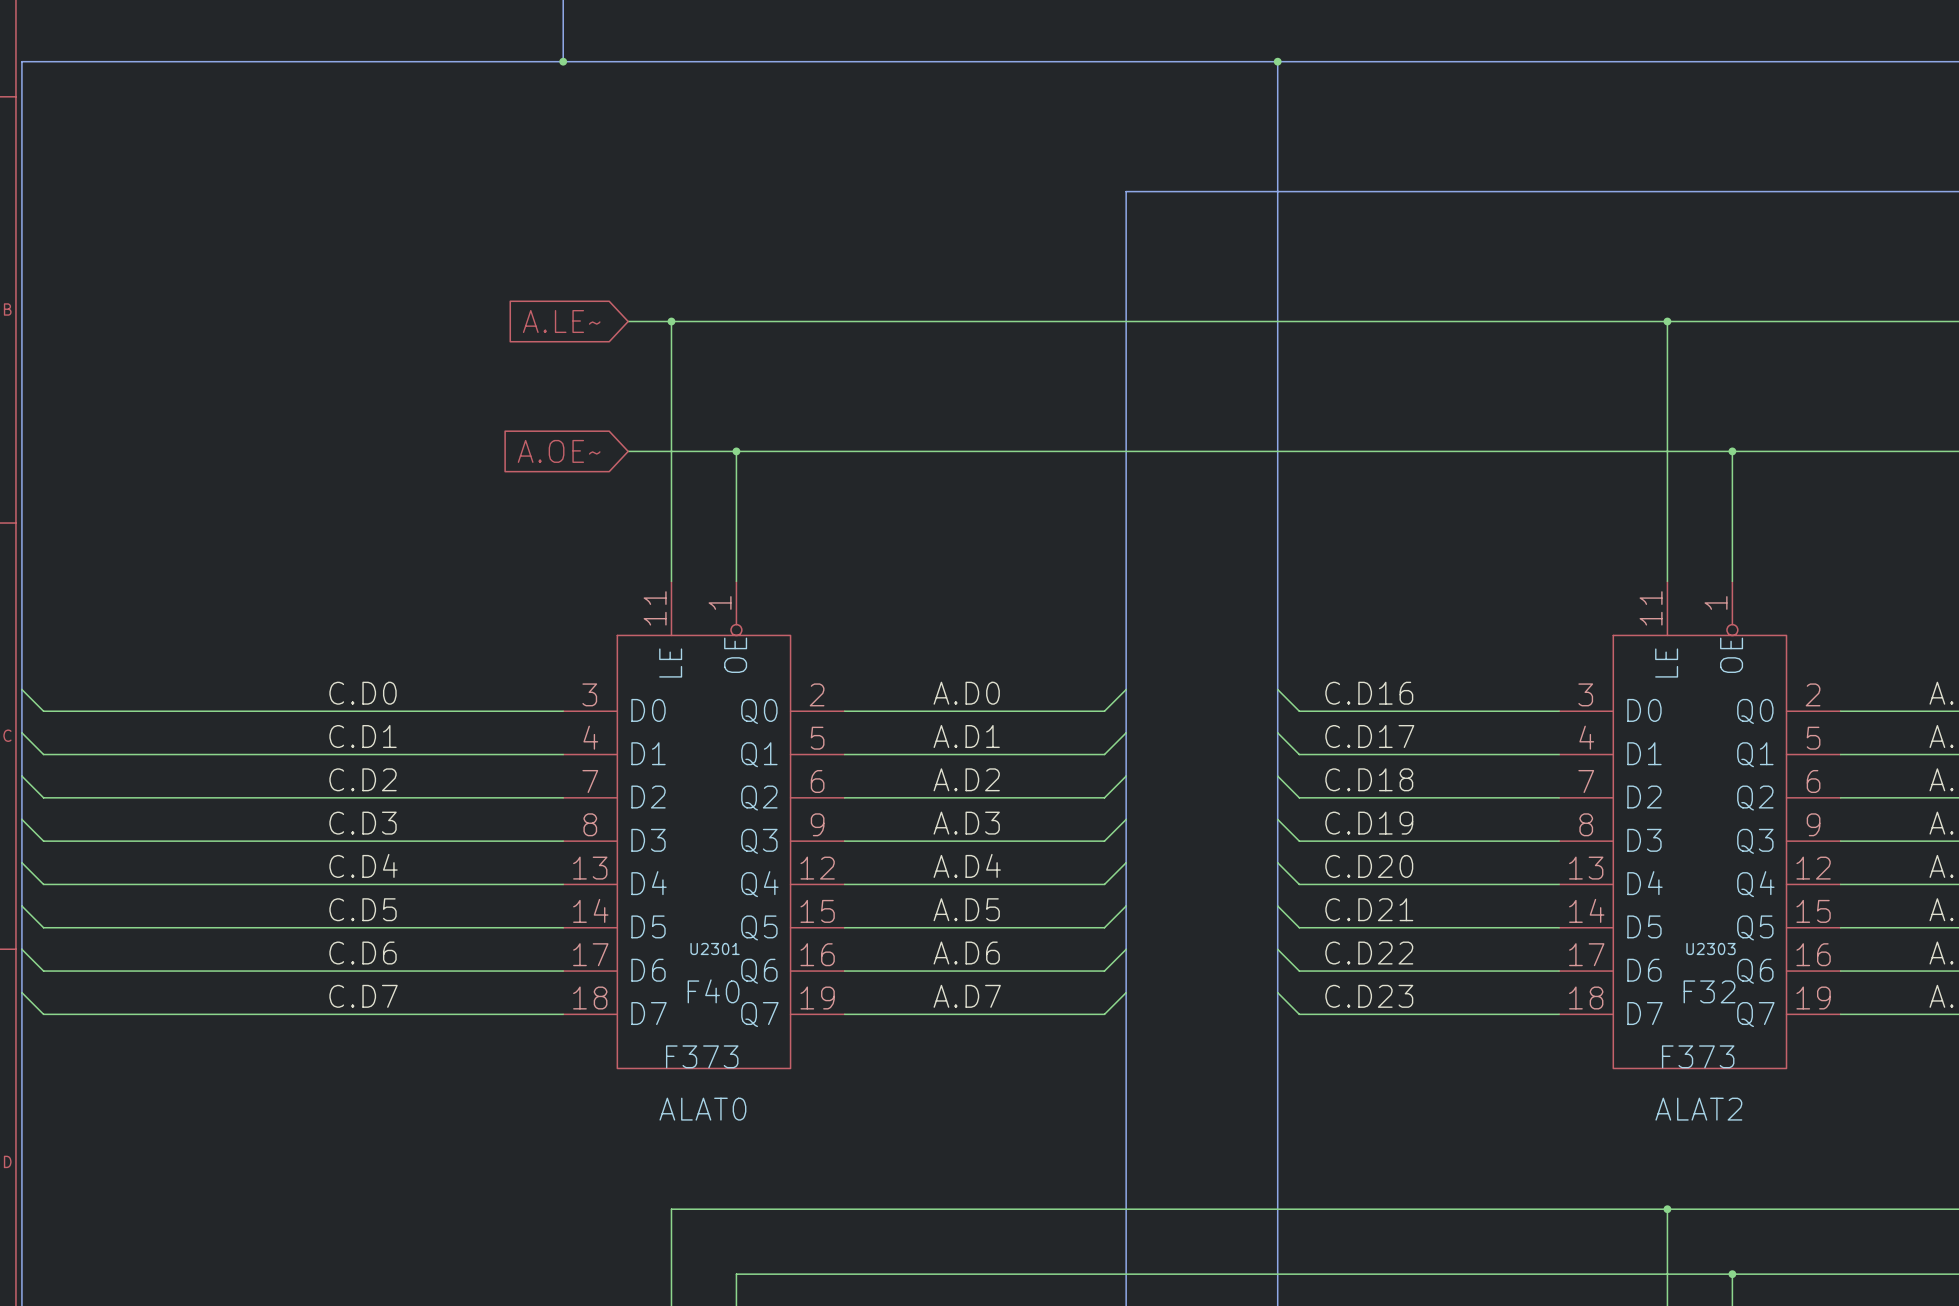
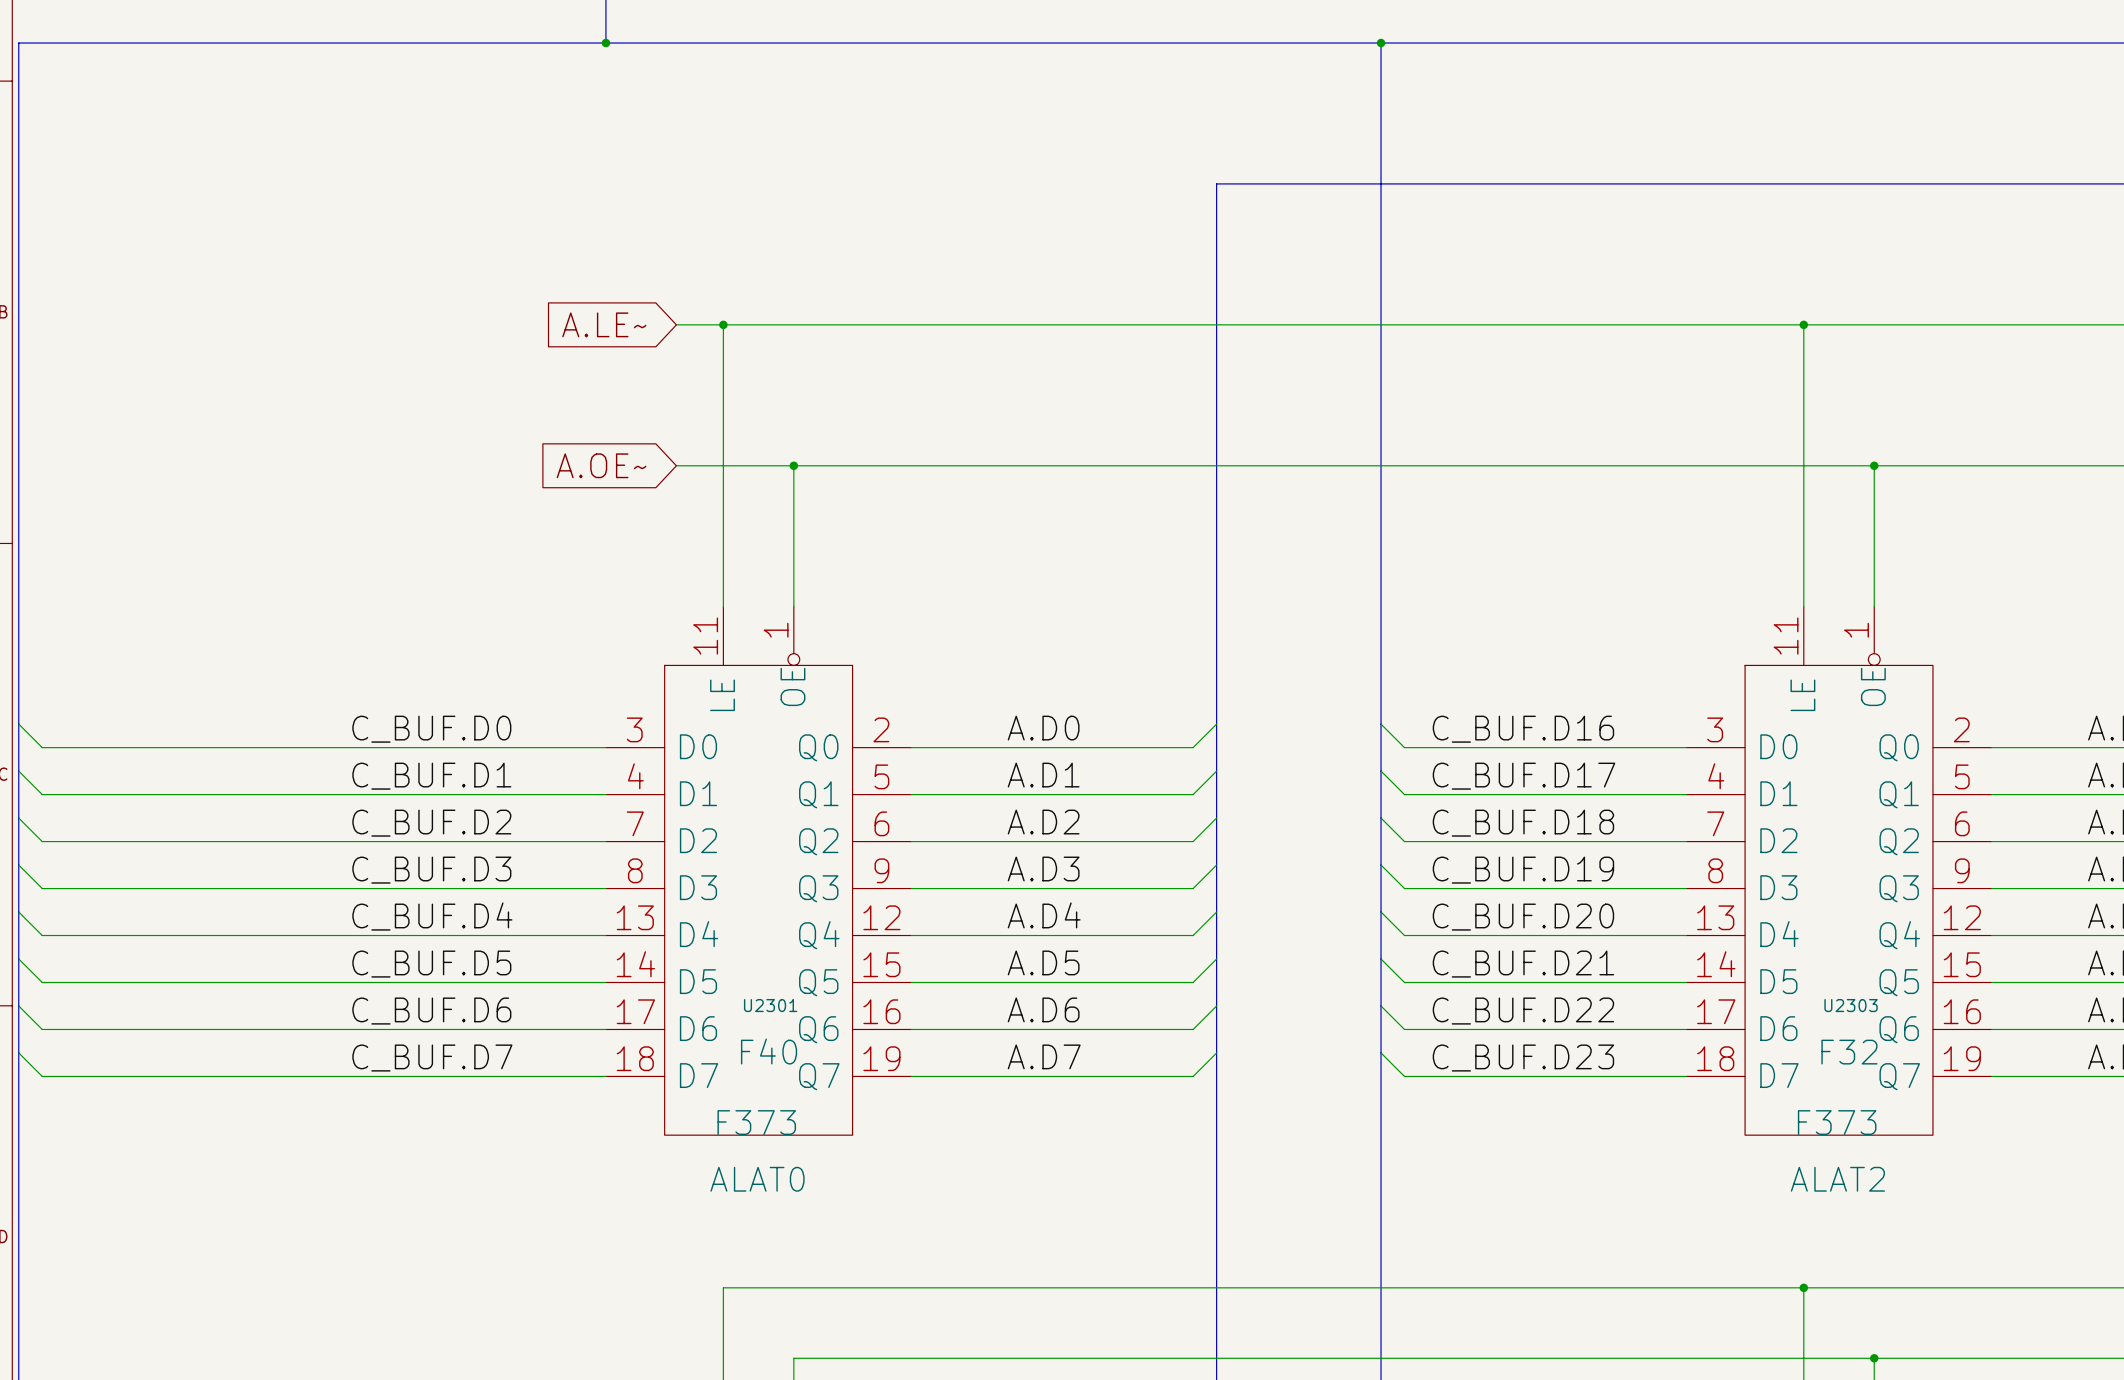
label: C.D0 (363, 693) -> C_BUF.D0 (431, 729)
label: C.D16 (1369, 693) -> C_BUF.D16 (1523, 729)
label: C.D1 (363, 736) -> C_BUF.D1 (431, 776)
label: C.D17 (1369, 736) -> C_BUF.D17 (1523, 776)
label: C.D2 (363, 779) -> C_BUF.D2 (431, 823)
label: C.D18 (1369, 779) -> C_BUF.D18 (1523, 823)
label: C.D3 (363, 823) -> C_BUF.D3 (431, 870)
label: C.D19 (1369, 823) -> C_BUF.D19 (1523, 870)
label: C.D4 (363, 865) -> C_BUF.D4 (432, 916)
label: C.D20 (1369, 866) -> C_BUF.D20 (1523, 917)
label: C.D5 (363, 909) -> C_BUF.D5 (431, 964)
label: C.D21 (1369, 909) -> C_BUF.D21 (1523, 964)
label: C.D6 (363, 953) -> C_BUF.D6 (431, 1011)
label: C.D22 (1369, 953) -> C_BUF.D22 (1523, 1011)
label: C.D7 (363, 996) -> C_BUF.D7 (432, 1058)
label: C.D23 (1369, 996) -> C_BUF.D23 (1523, 1058)

